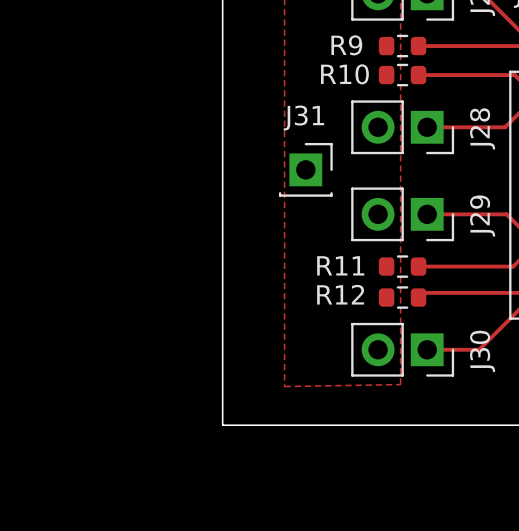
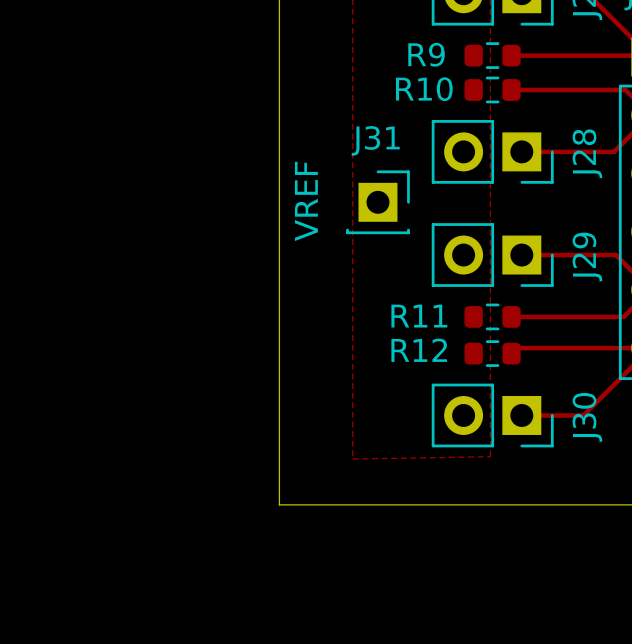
text: none -> VREF (306, 201)

